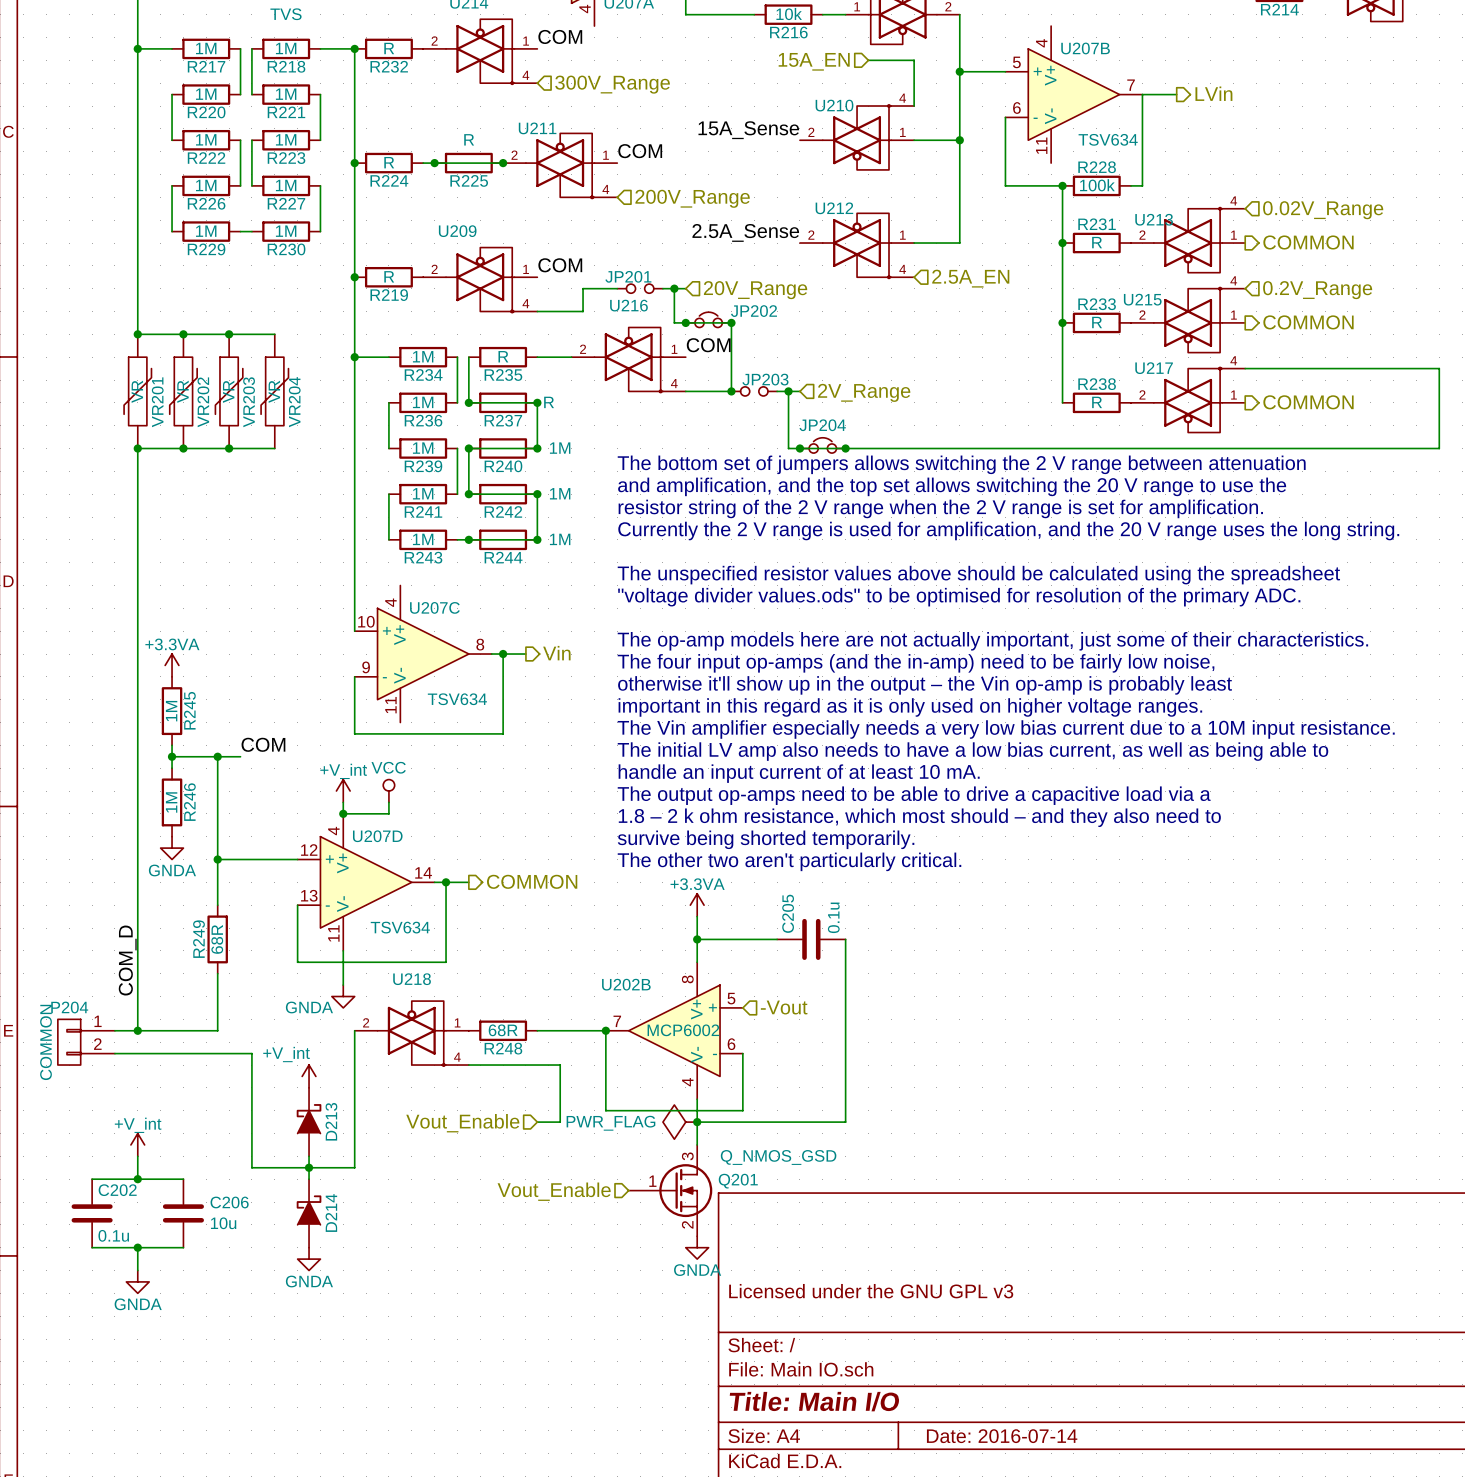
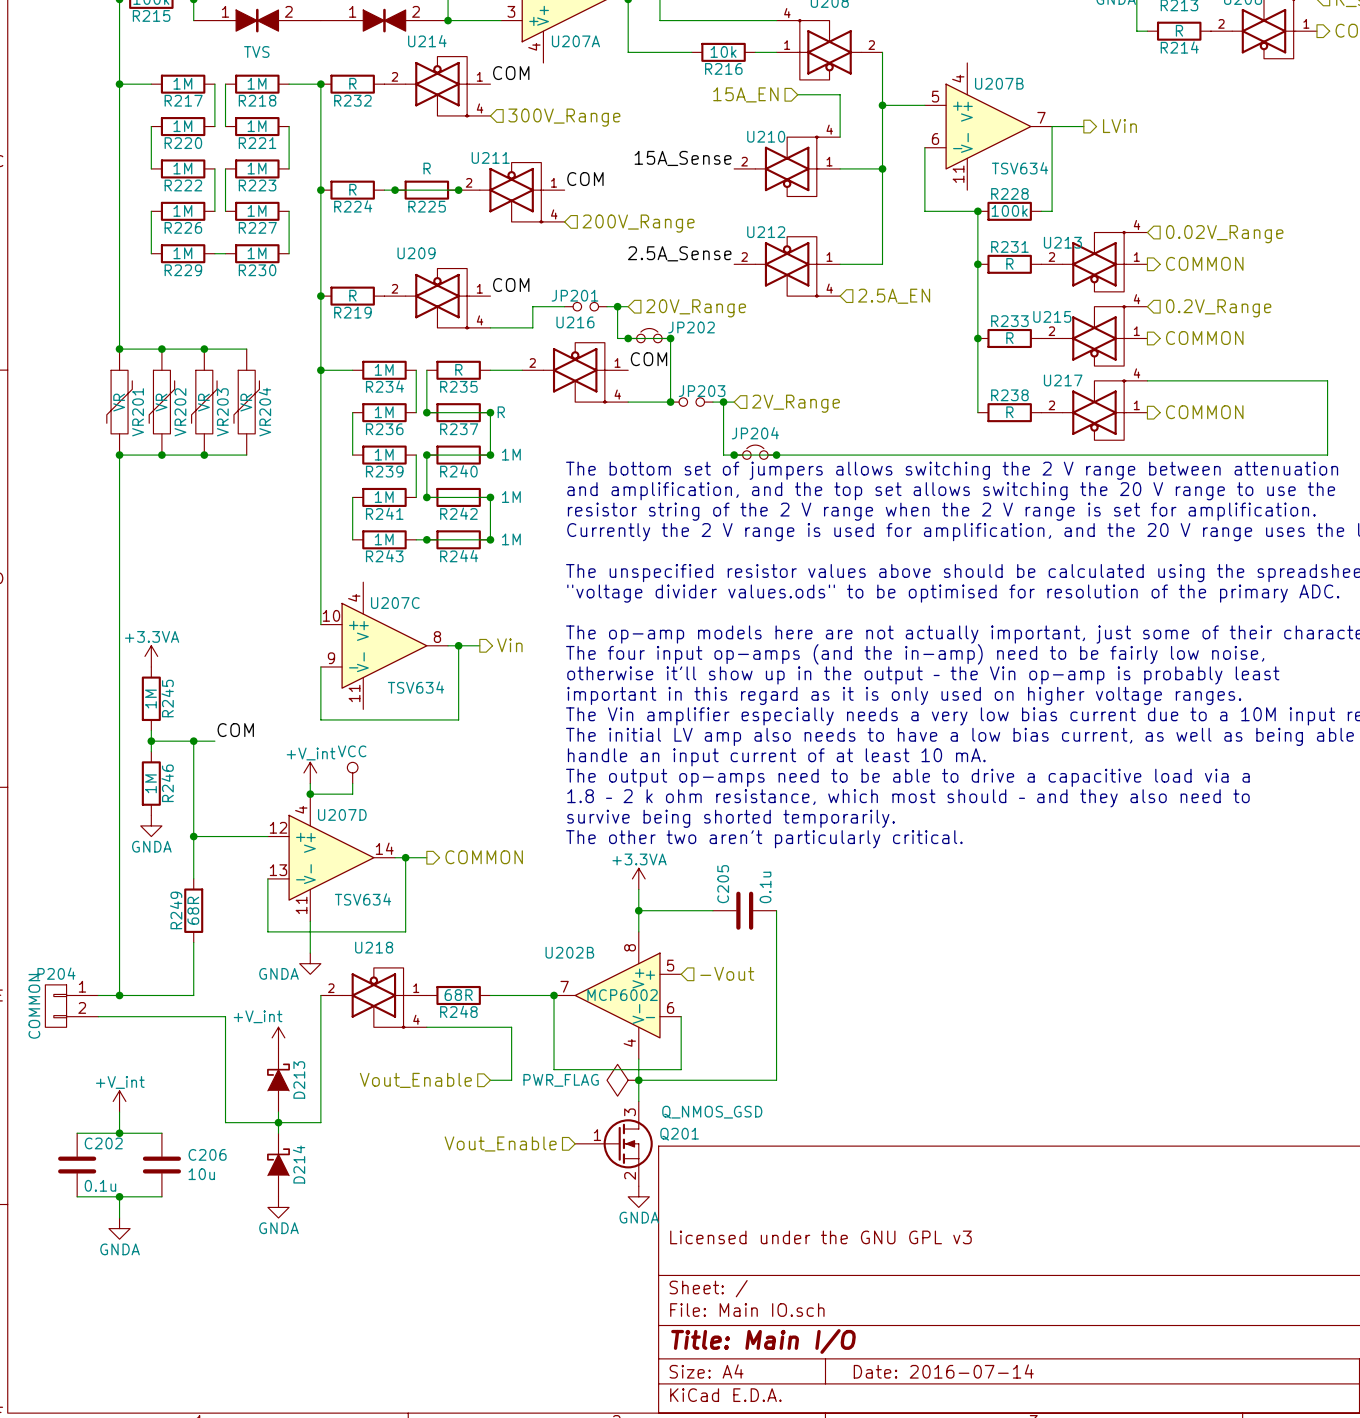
label: COM_D (127, 960) -> none

